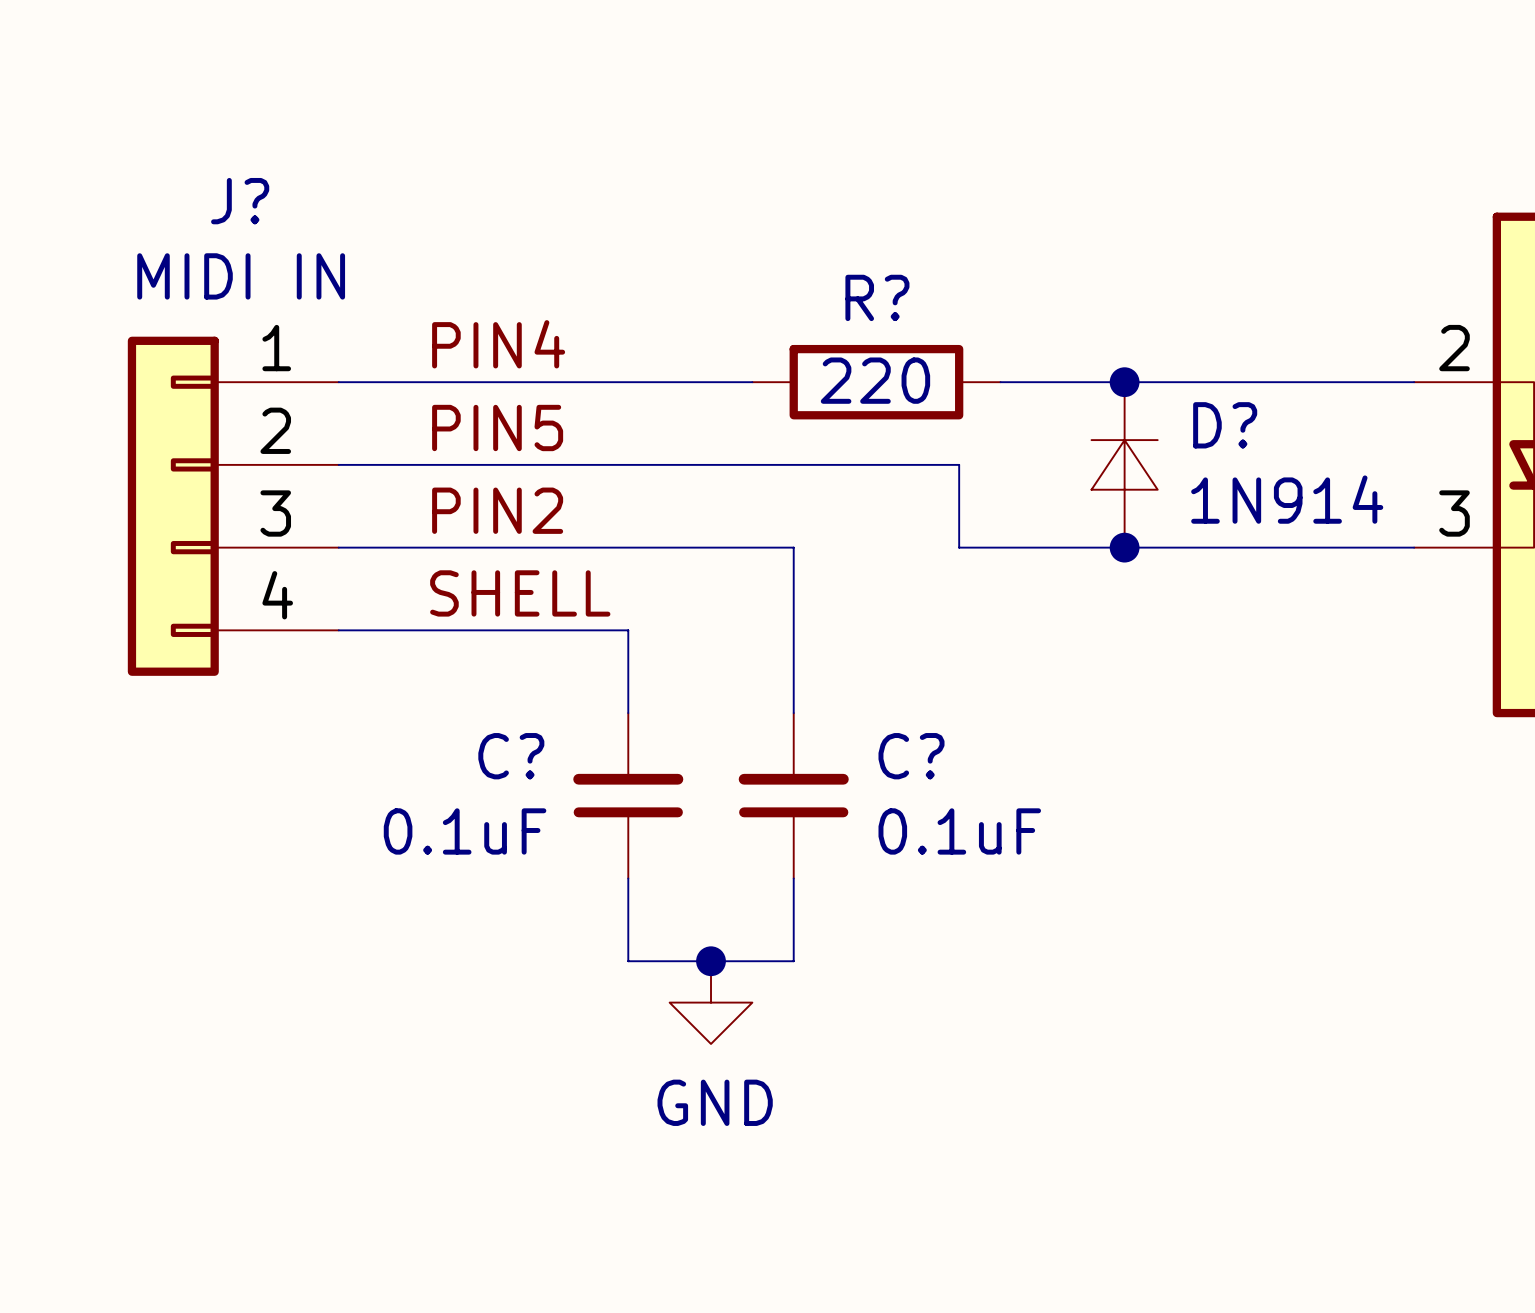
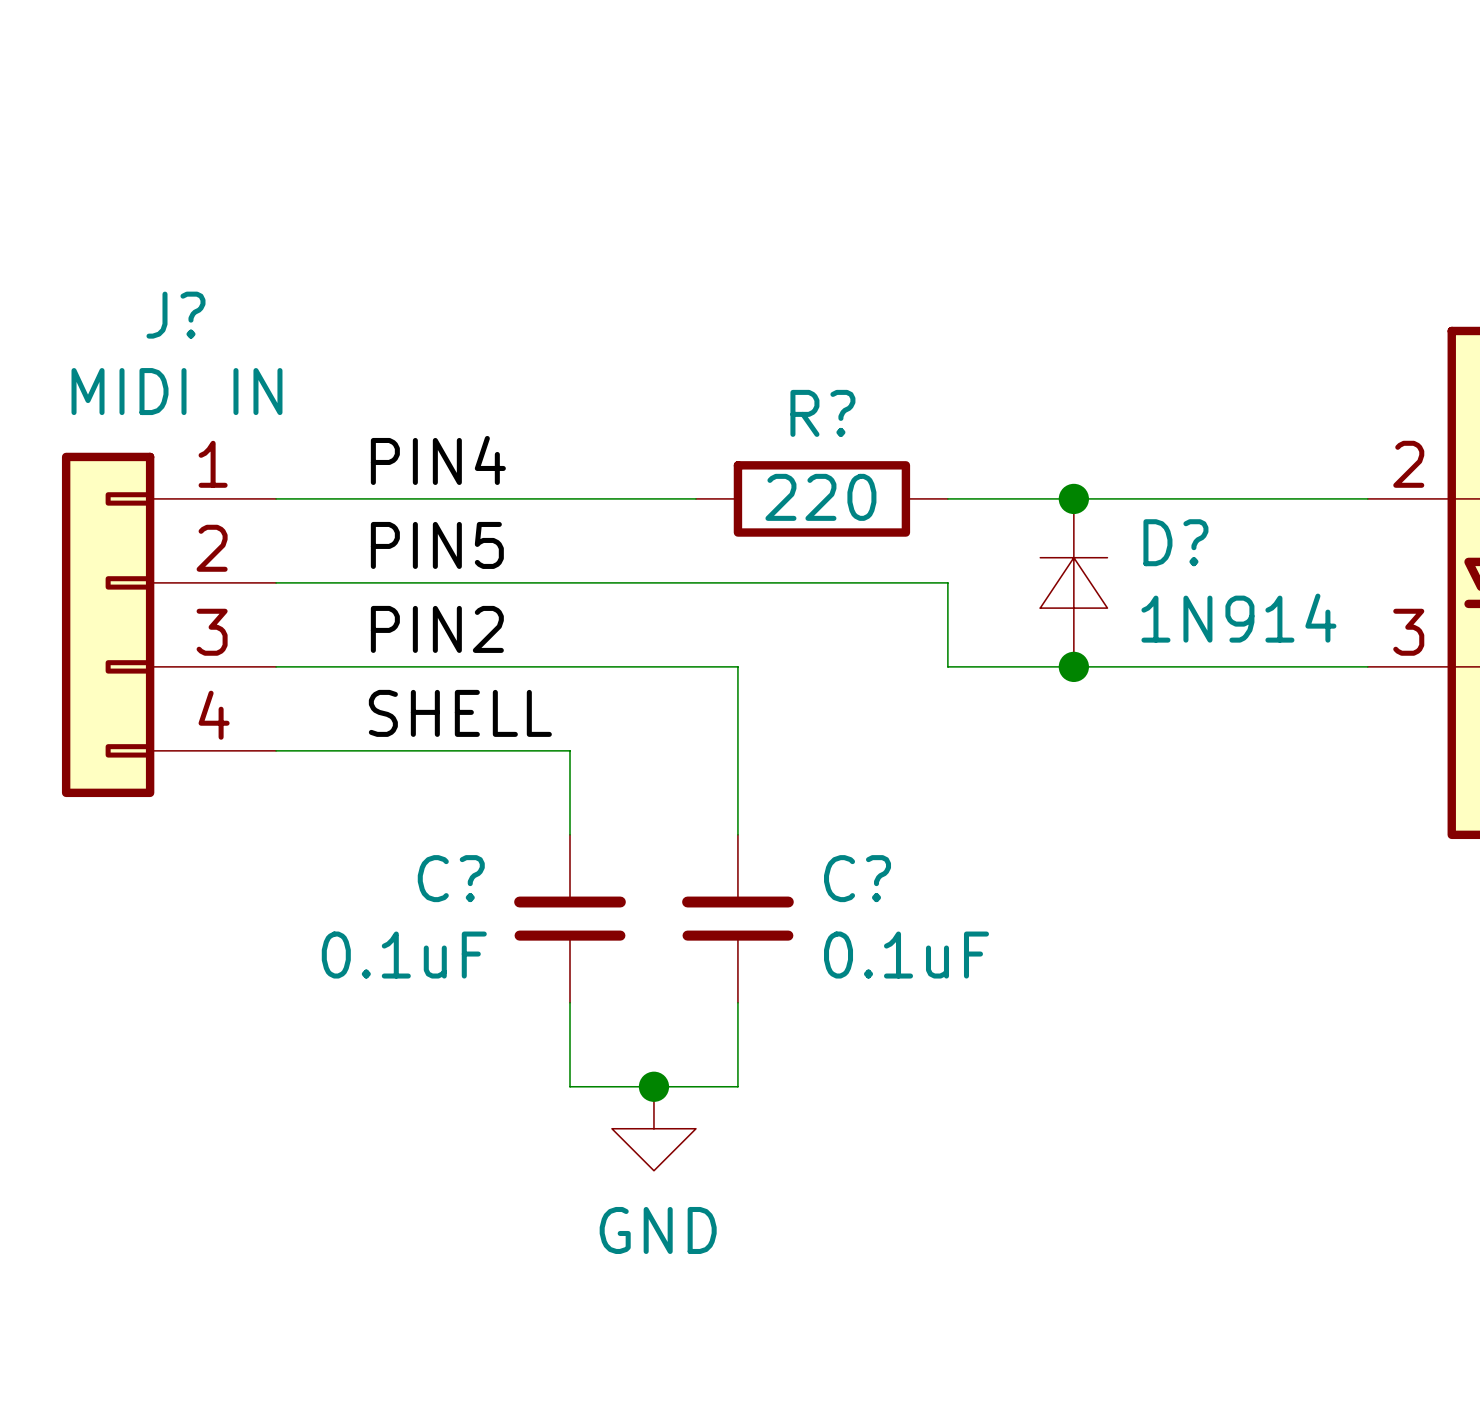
wire: (959, 464) (959, 547) (1000, 547) -> (905, 582) (947, 582) (947, 666)

